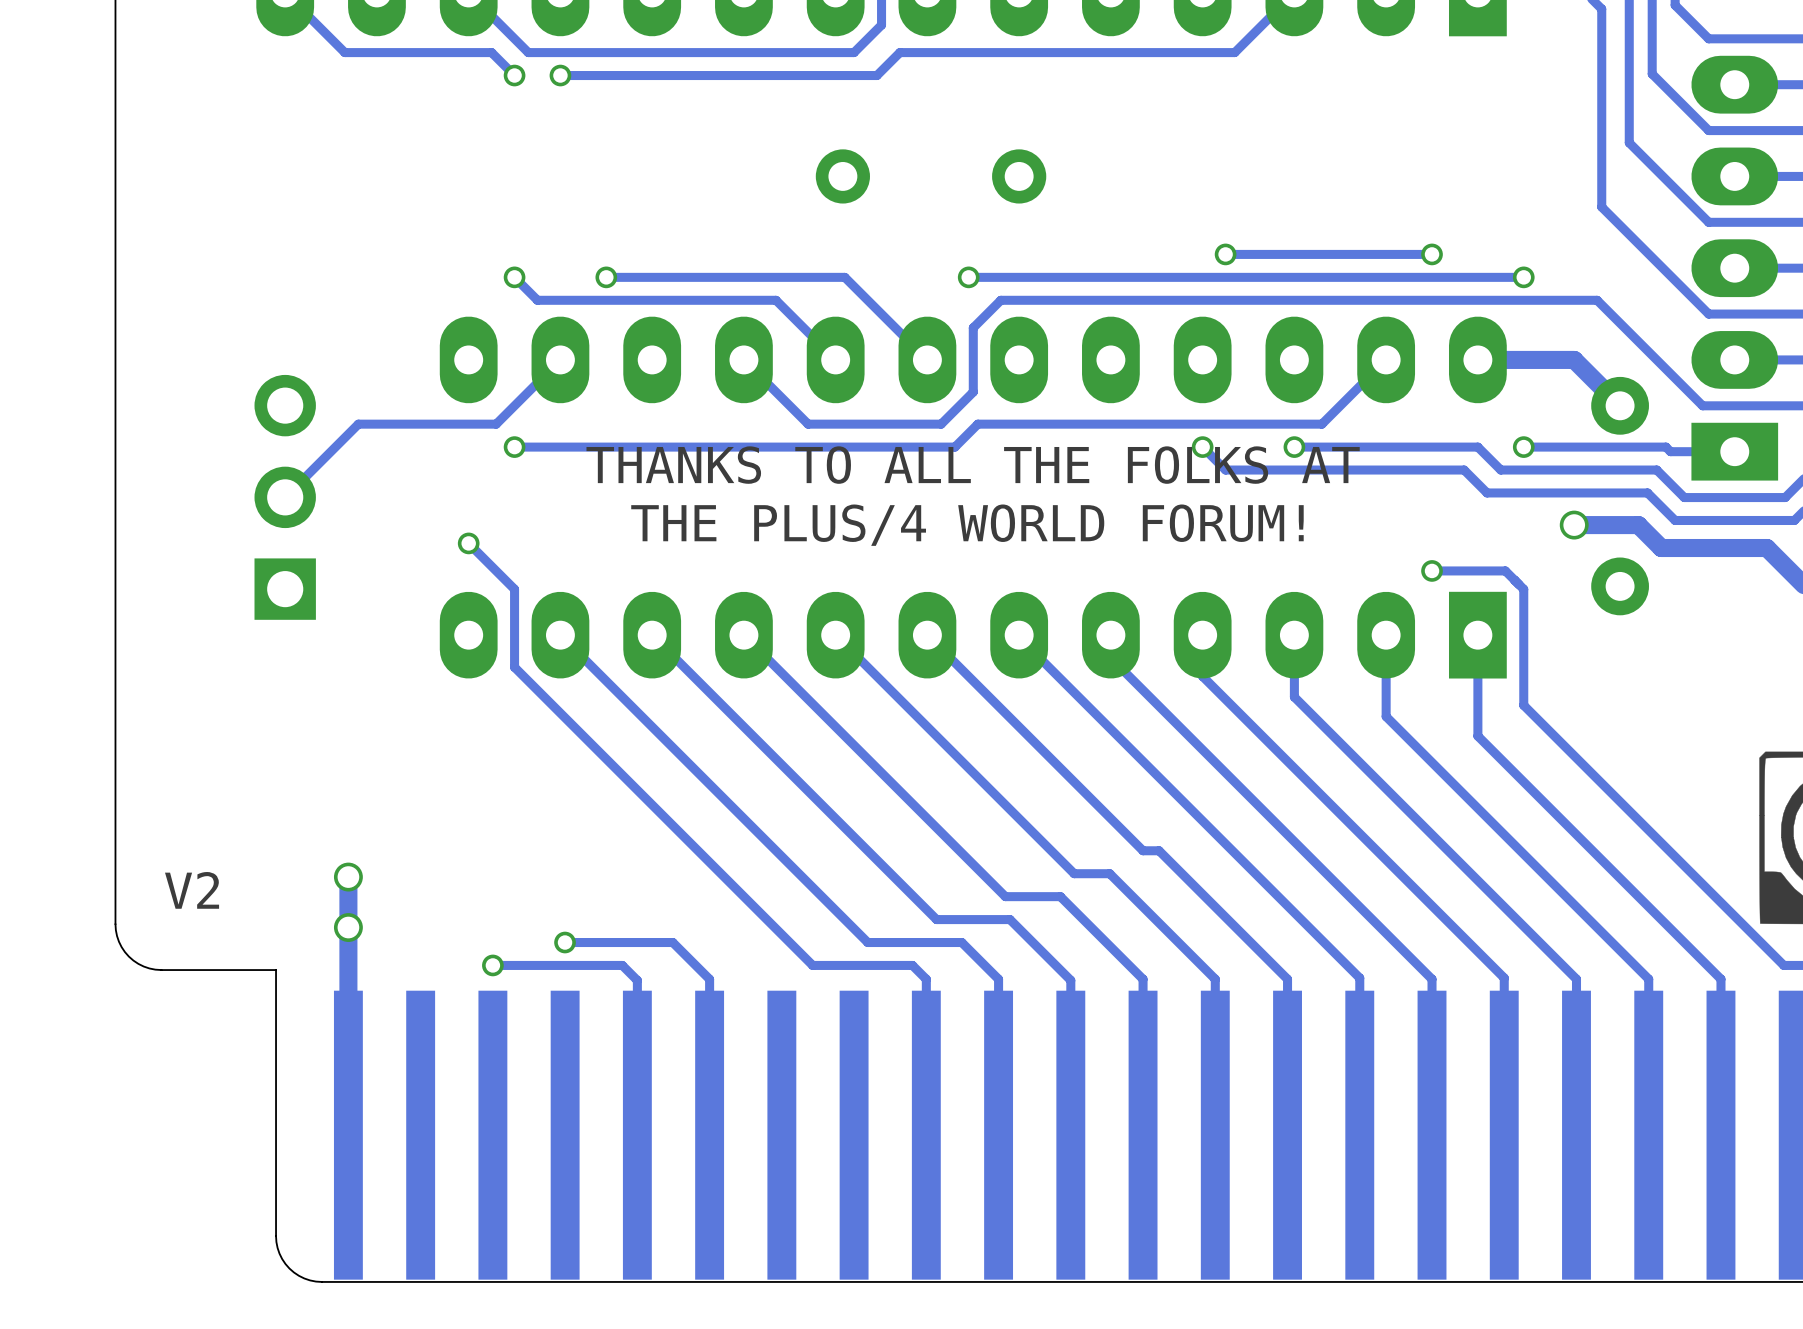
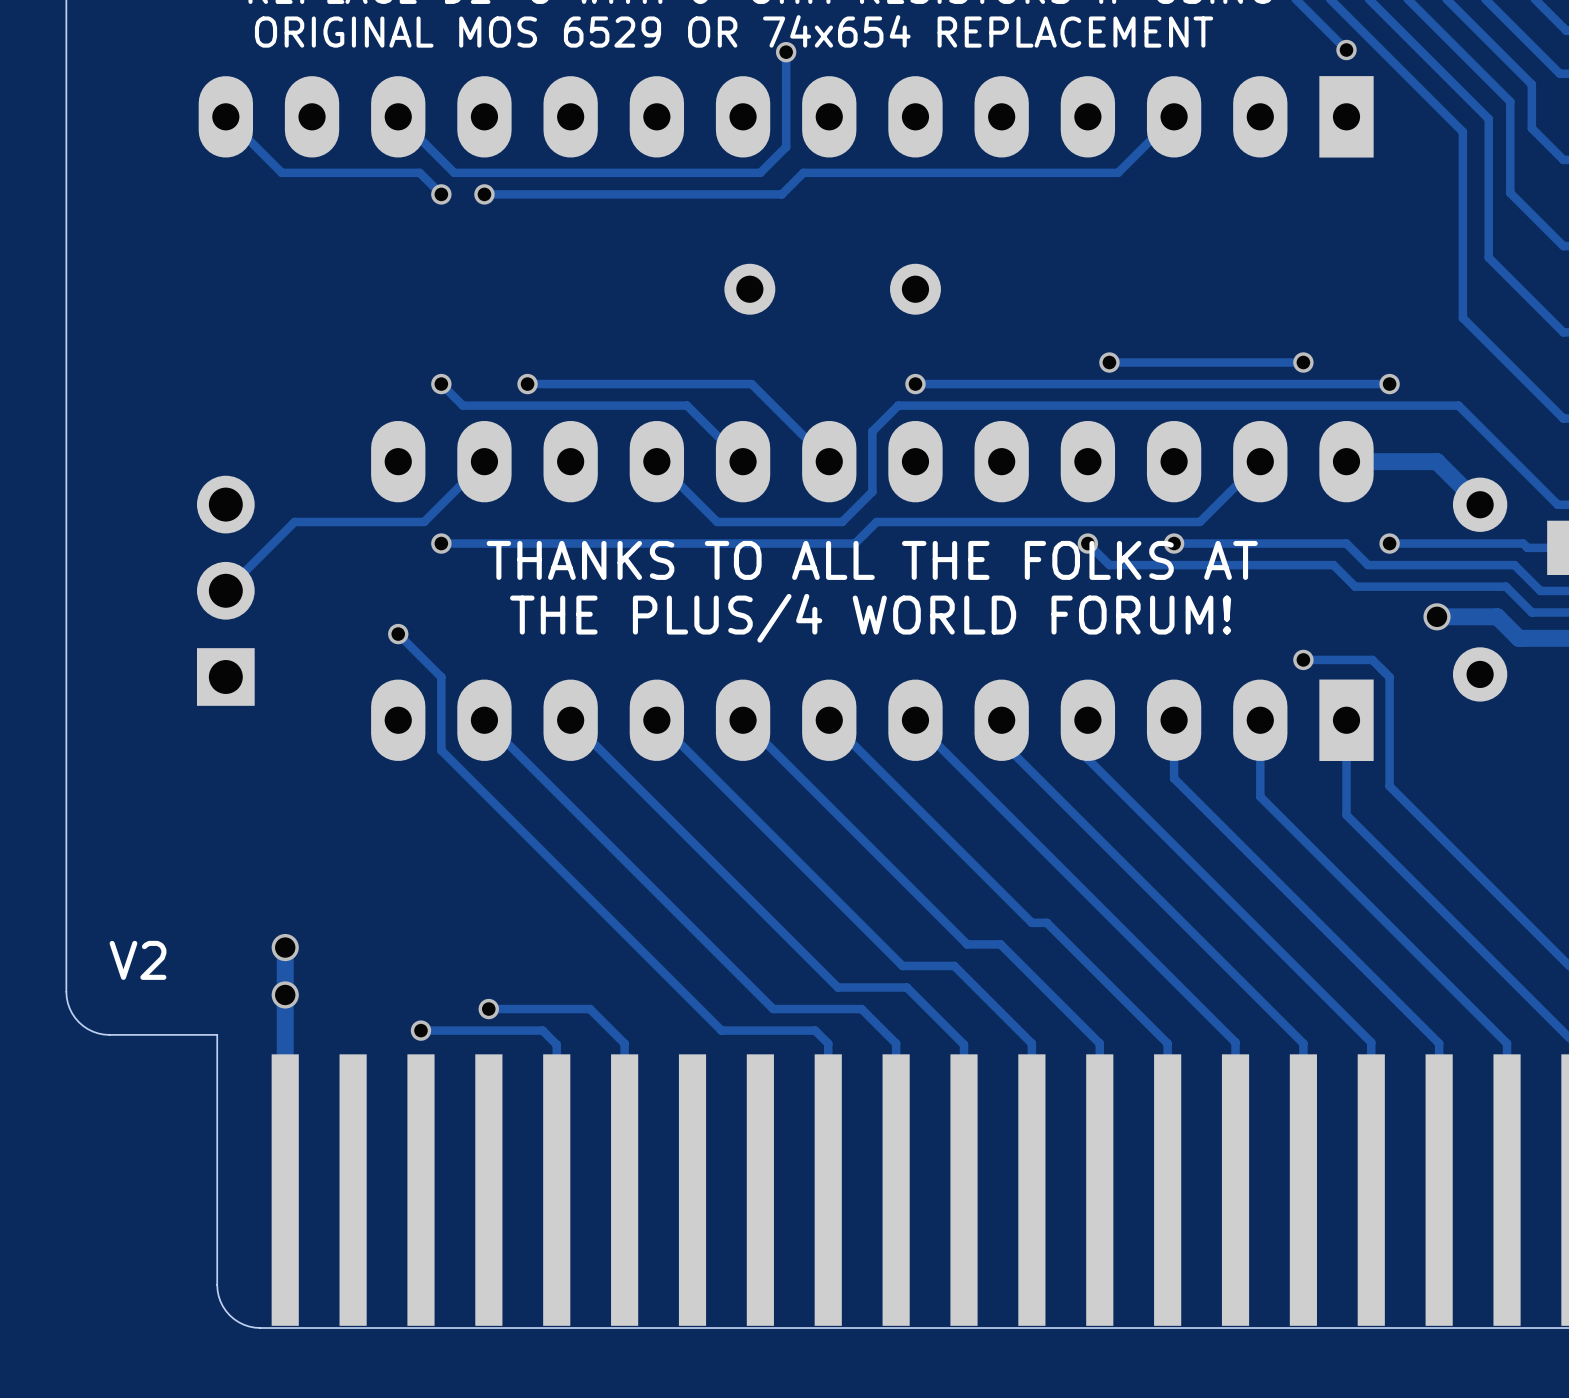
via position: (968, 277) -> (915, 384)
track: (1019, 277) (968, 277) -> none

